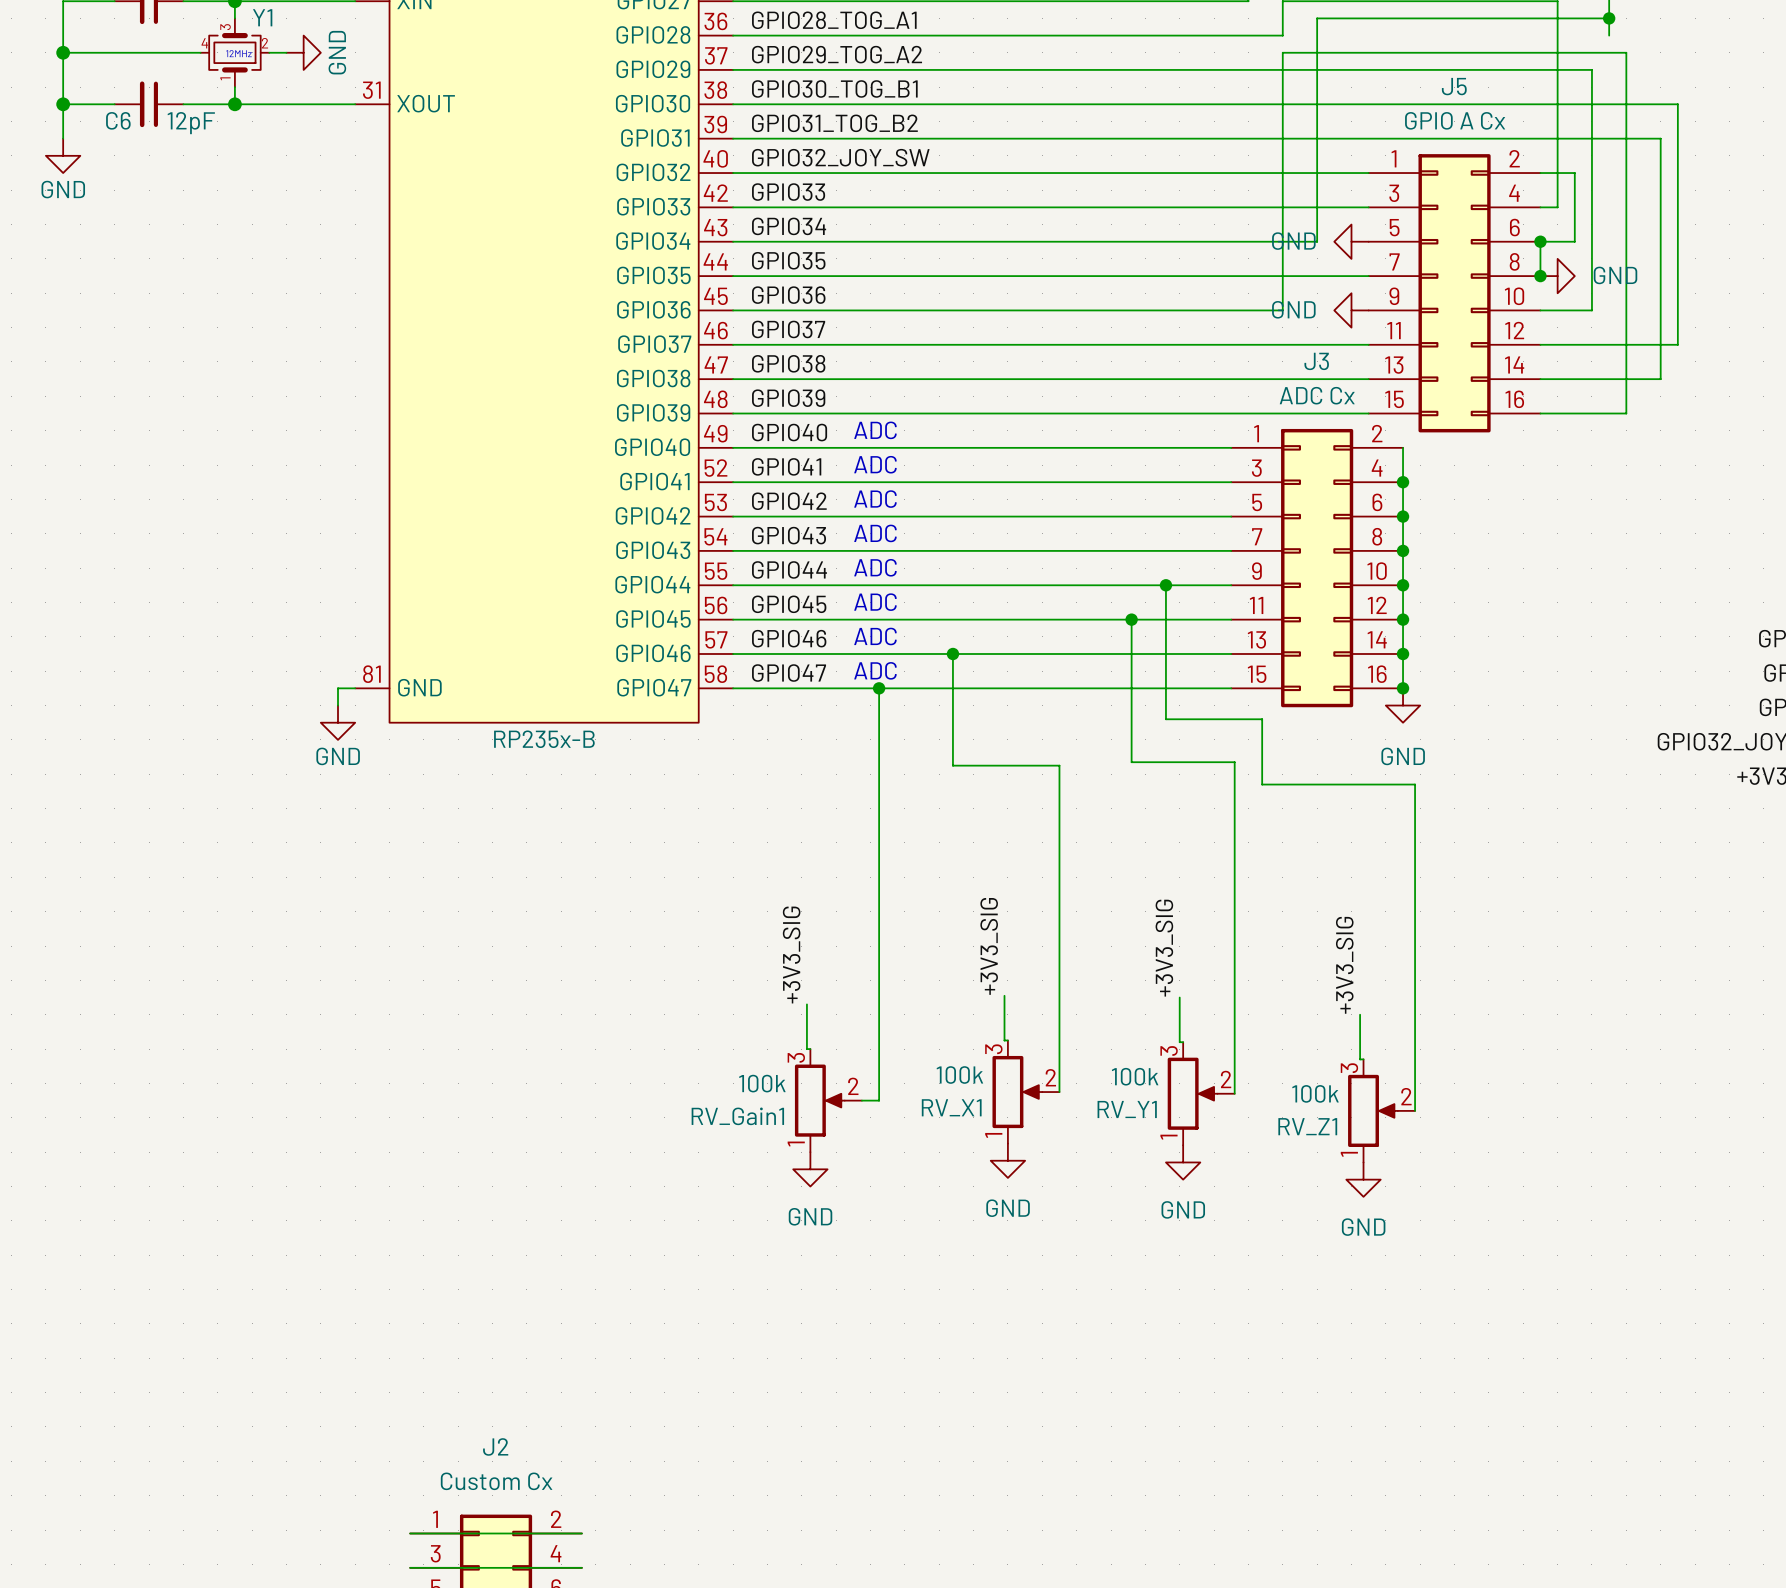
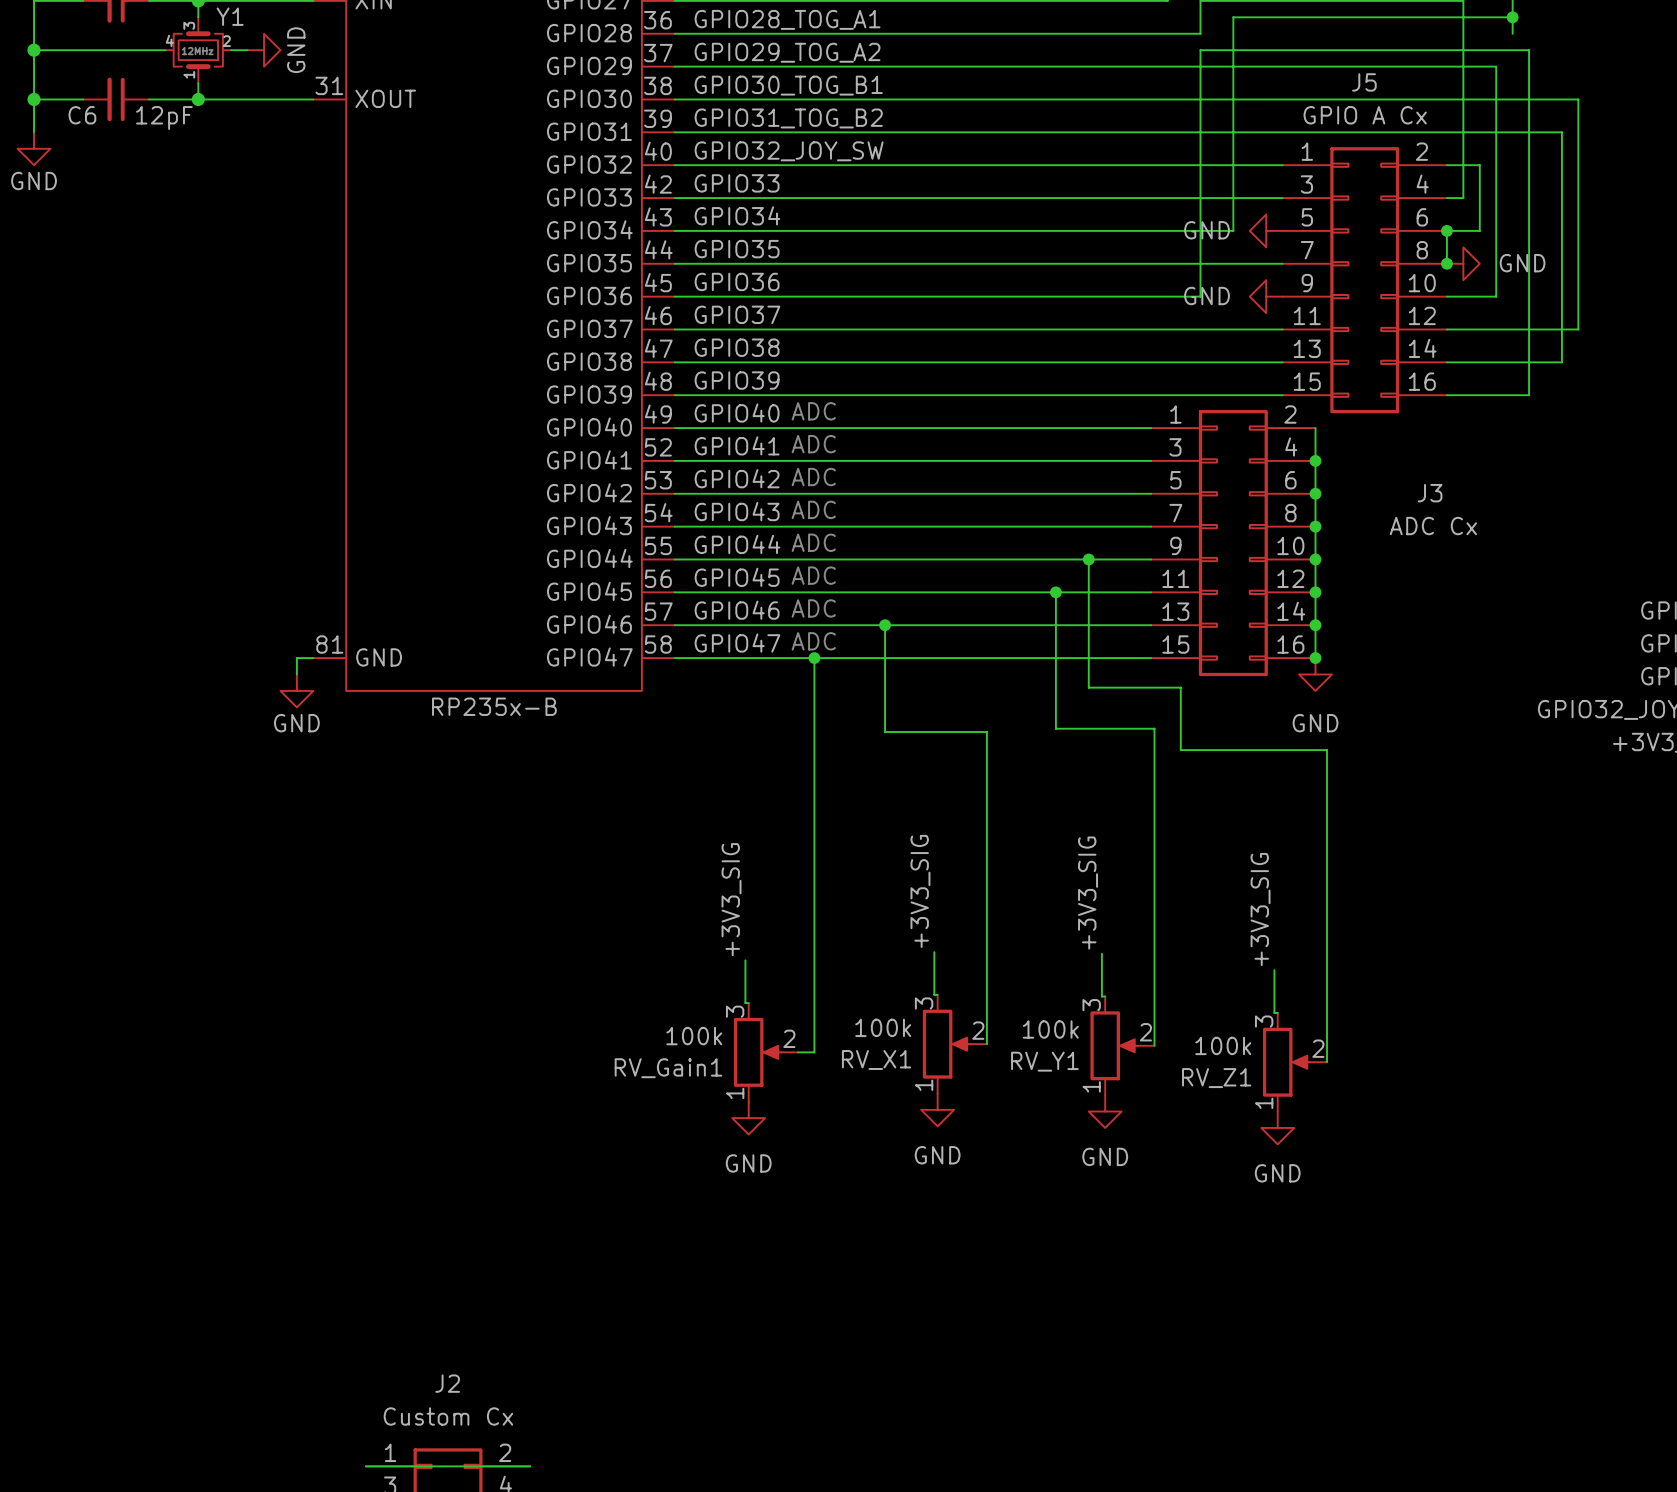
J3 name position: J3 (1316, 361) -> J3 (1430, 493)
J3 value position: ADC Cx (1317, 395) -> ADC Cx (1433, 526)

